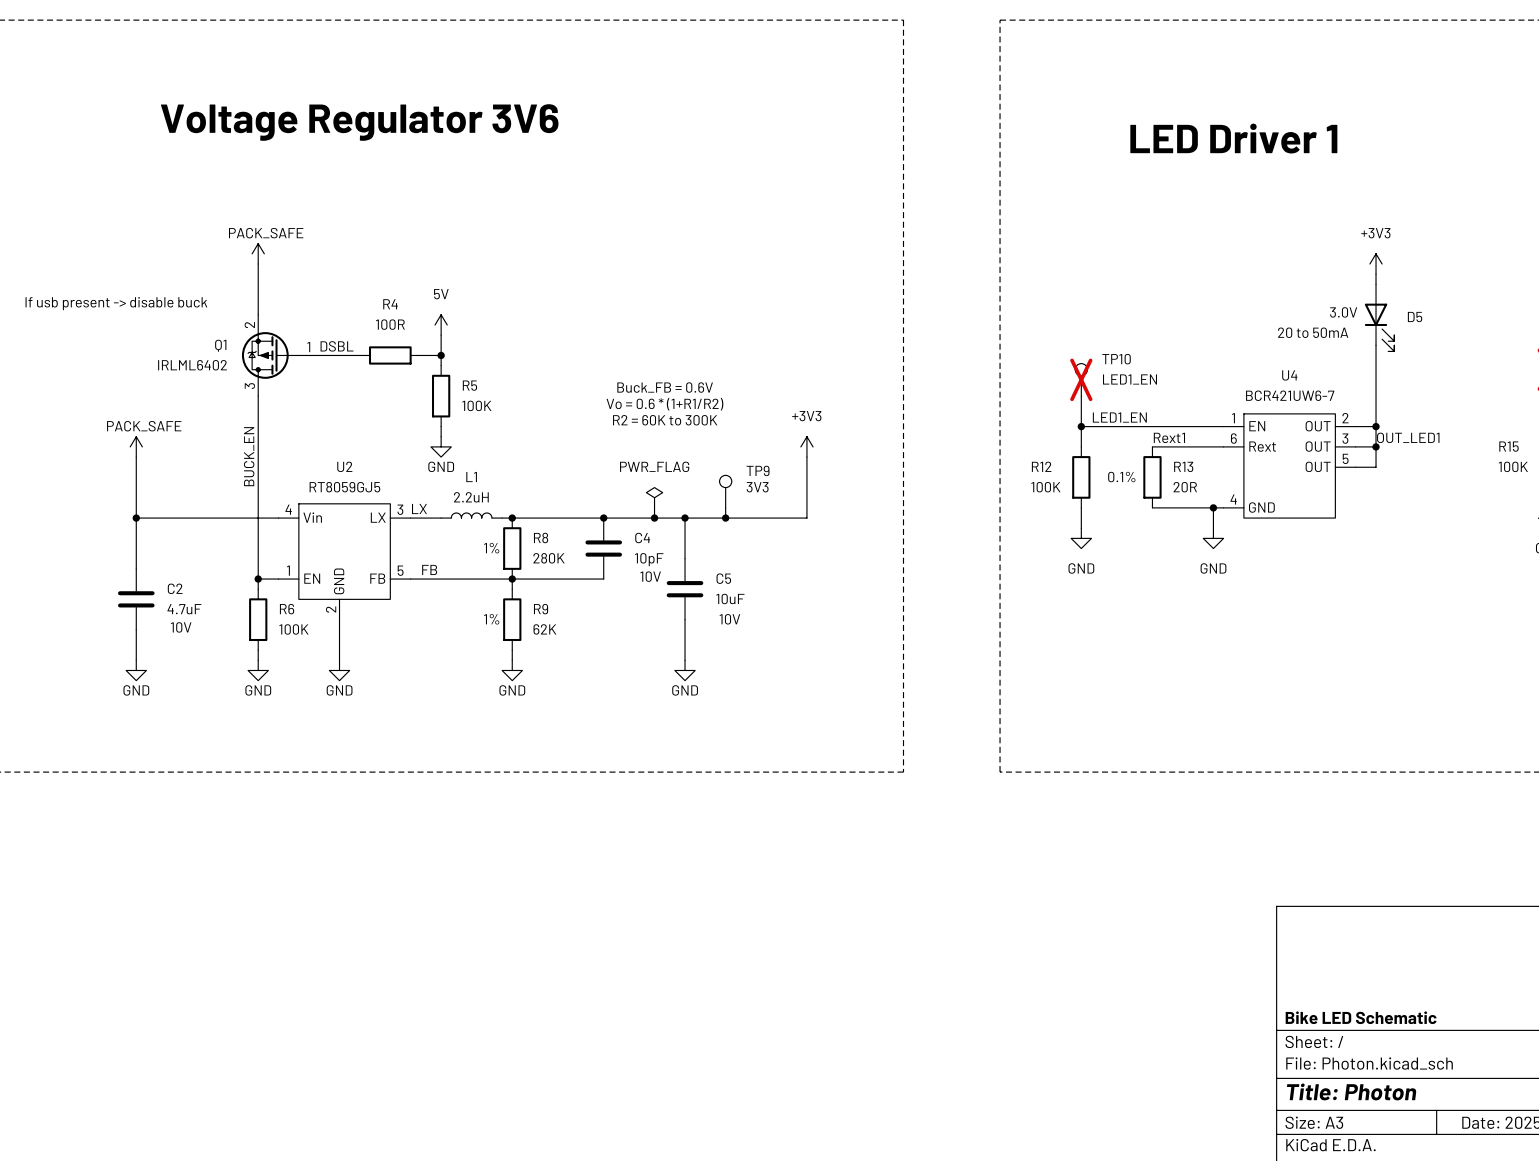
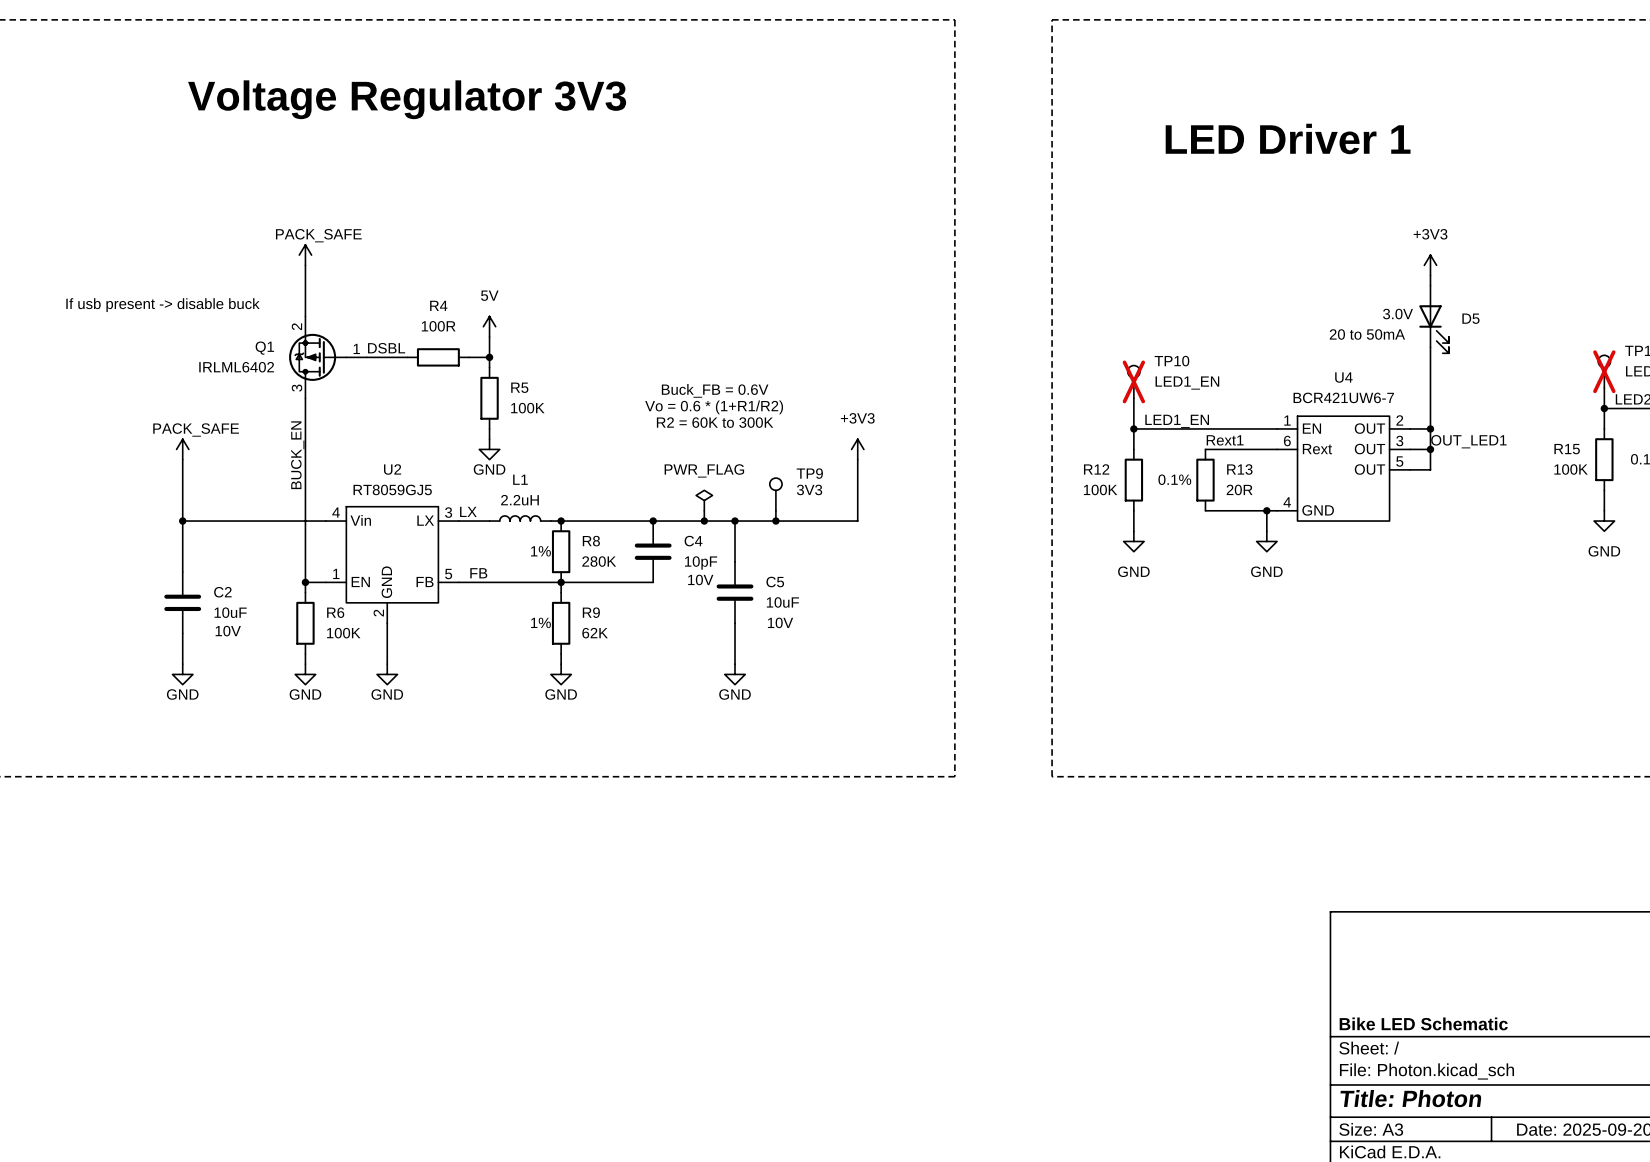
text: Voltage Regulator 3V6 (359, 122) -> Voltage Regulator 3V3 (407, 99)
C2 value: 4.7uF (184, 609) -> 10uF (230, 612)

